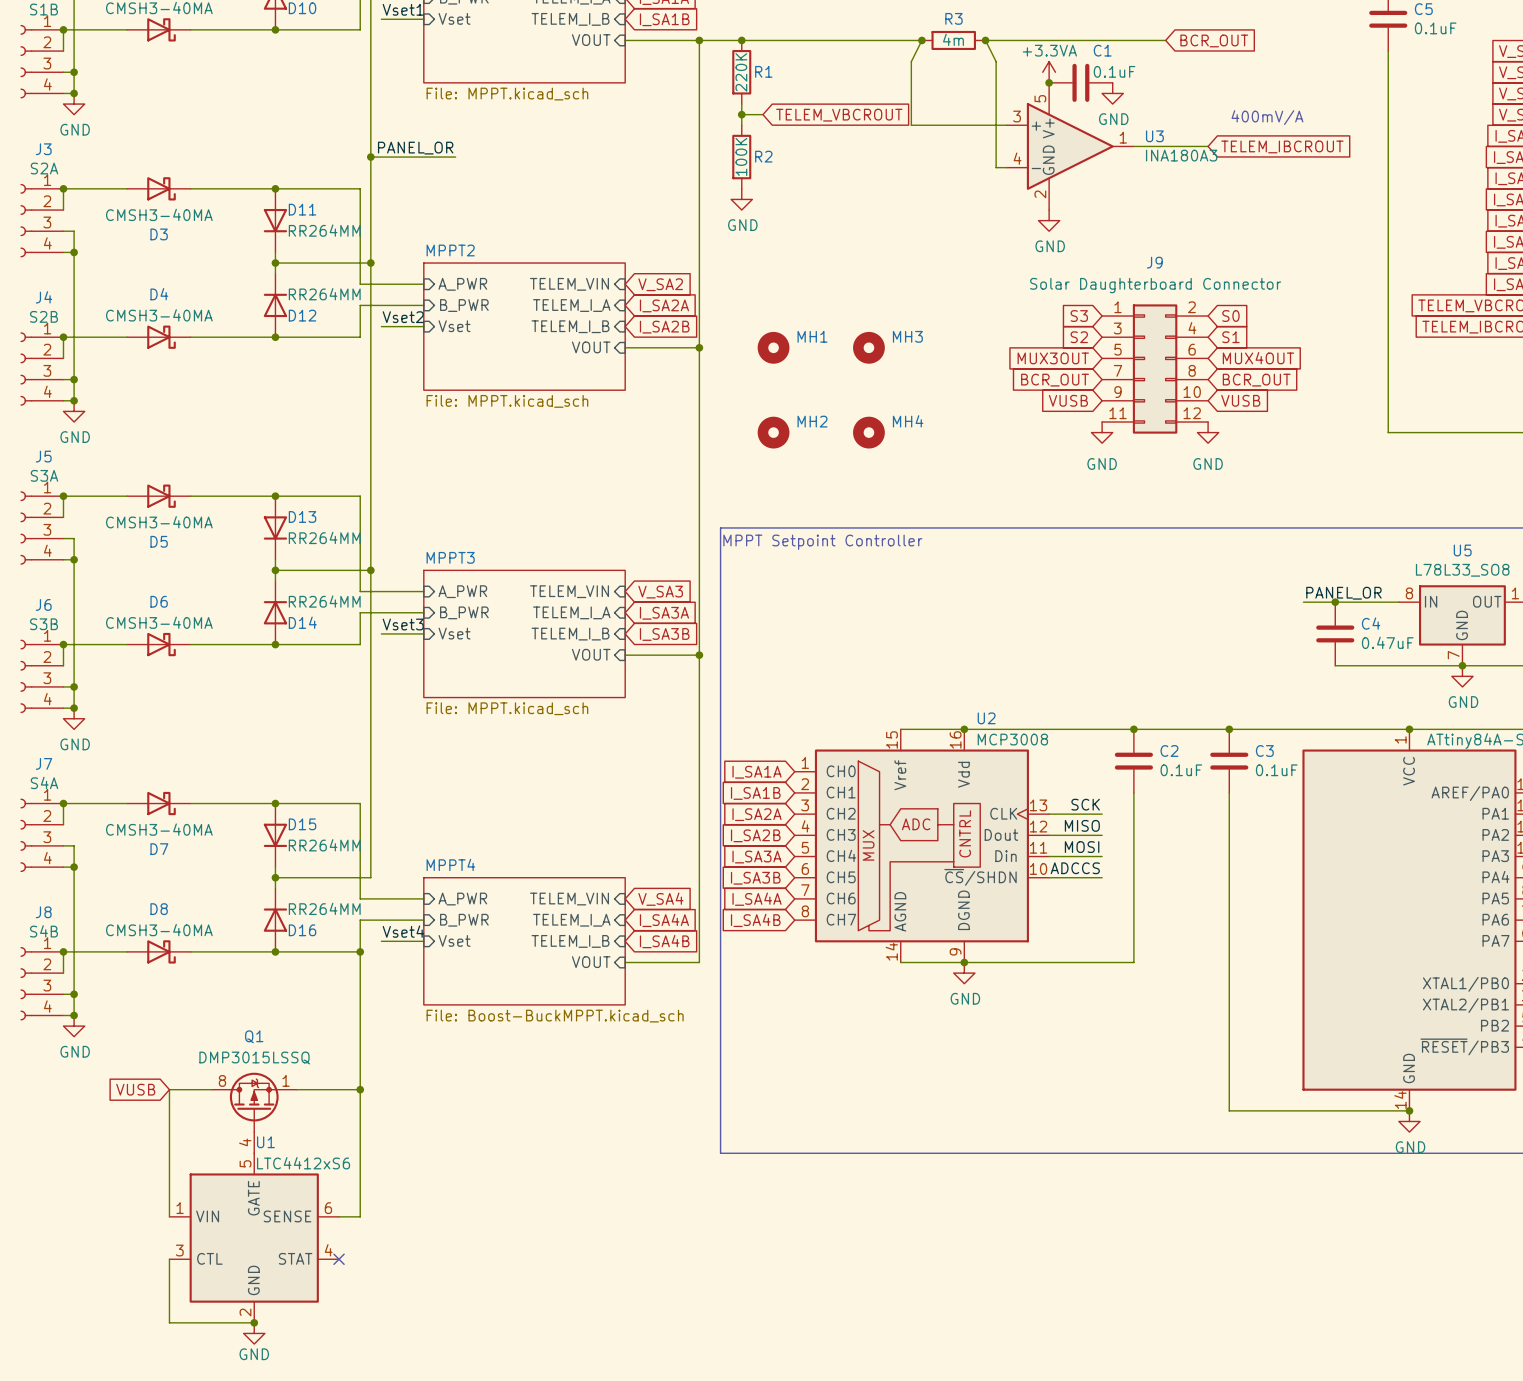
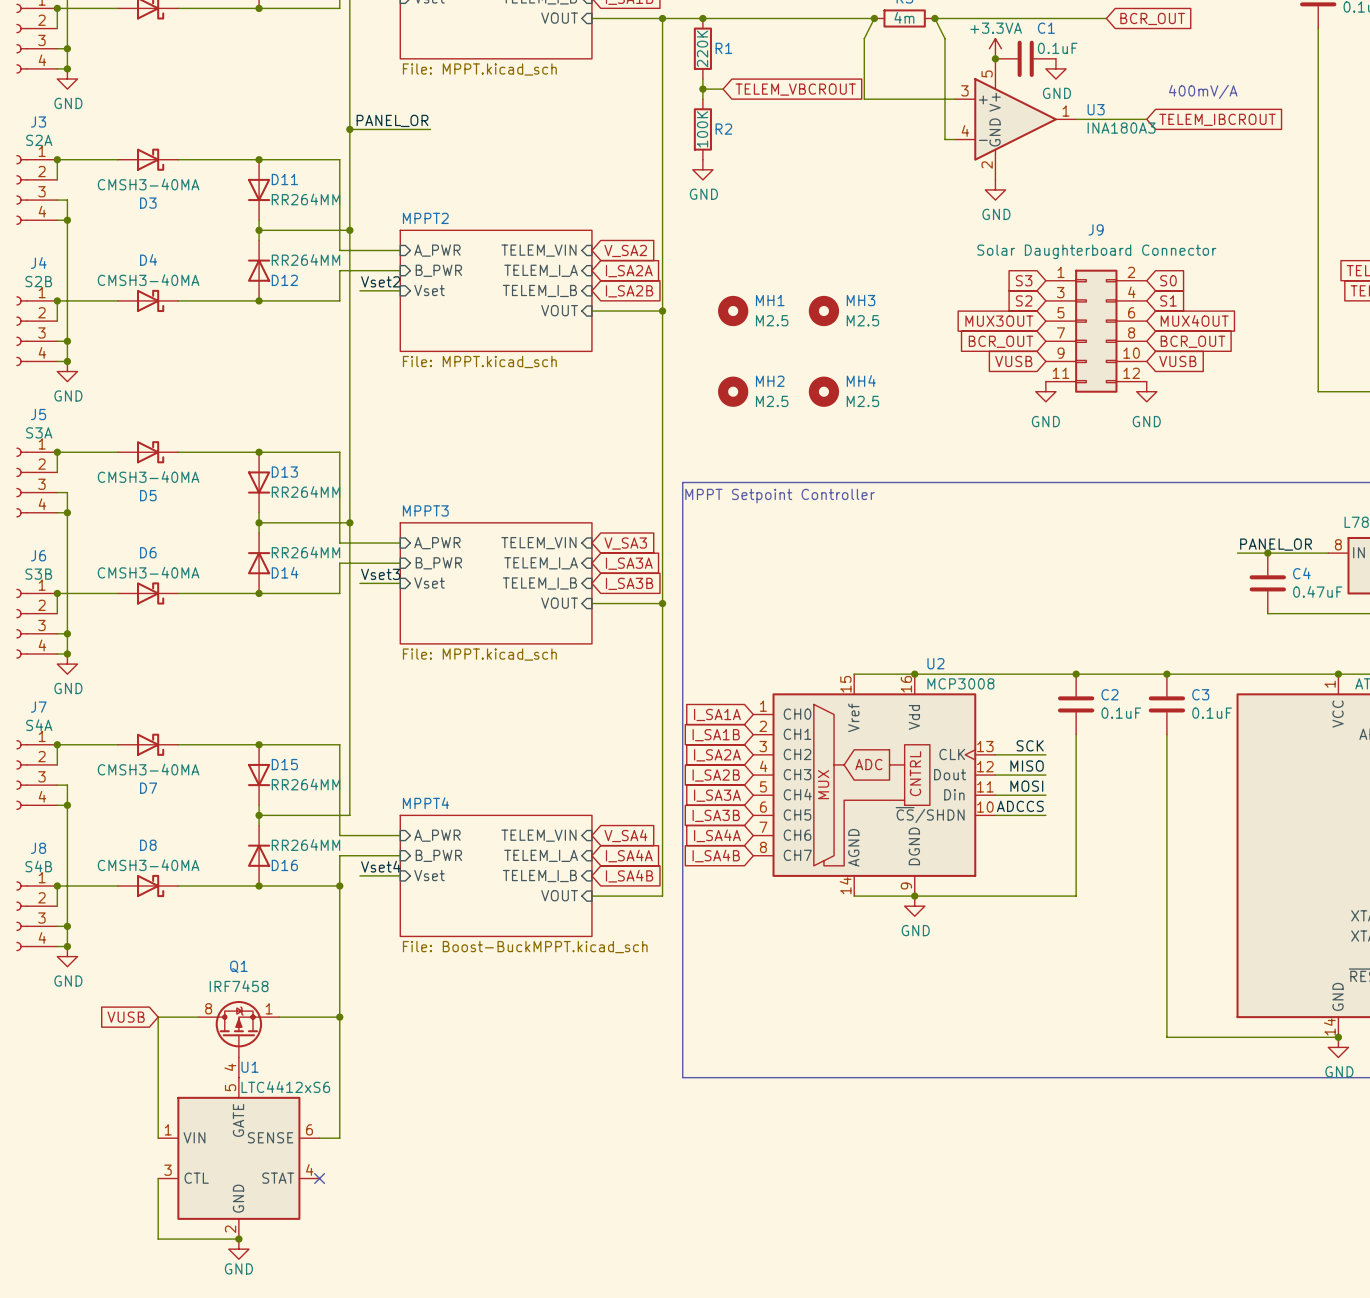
MH1 value: none -> M2.5 (772, 320)
MH3 value: none -> M2.5 (862, 320)
MH2 value: none -> M2.5 (772, 401)
MH4 value: none -> M2.5 (862, 401)
Q1 value: DMP3015LSSQ (254, 1058) -> IRF7458 (239, 986)

